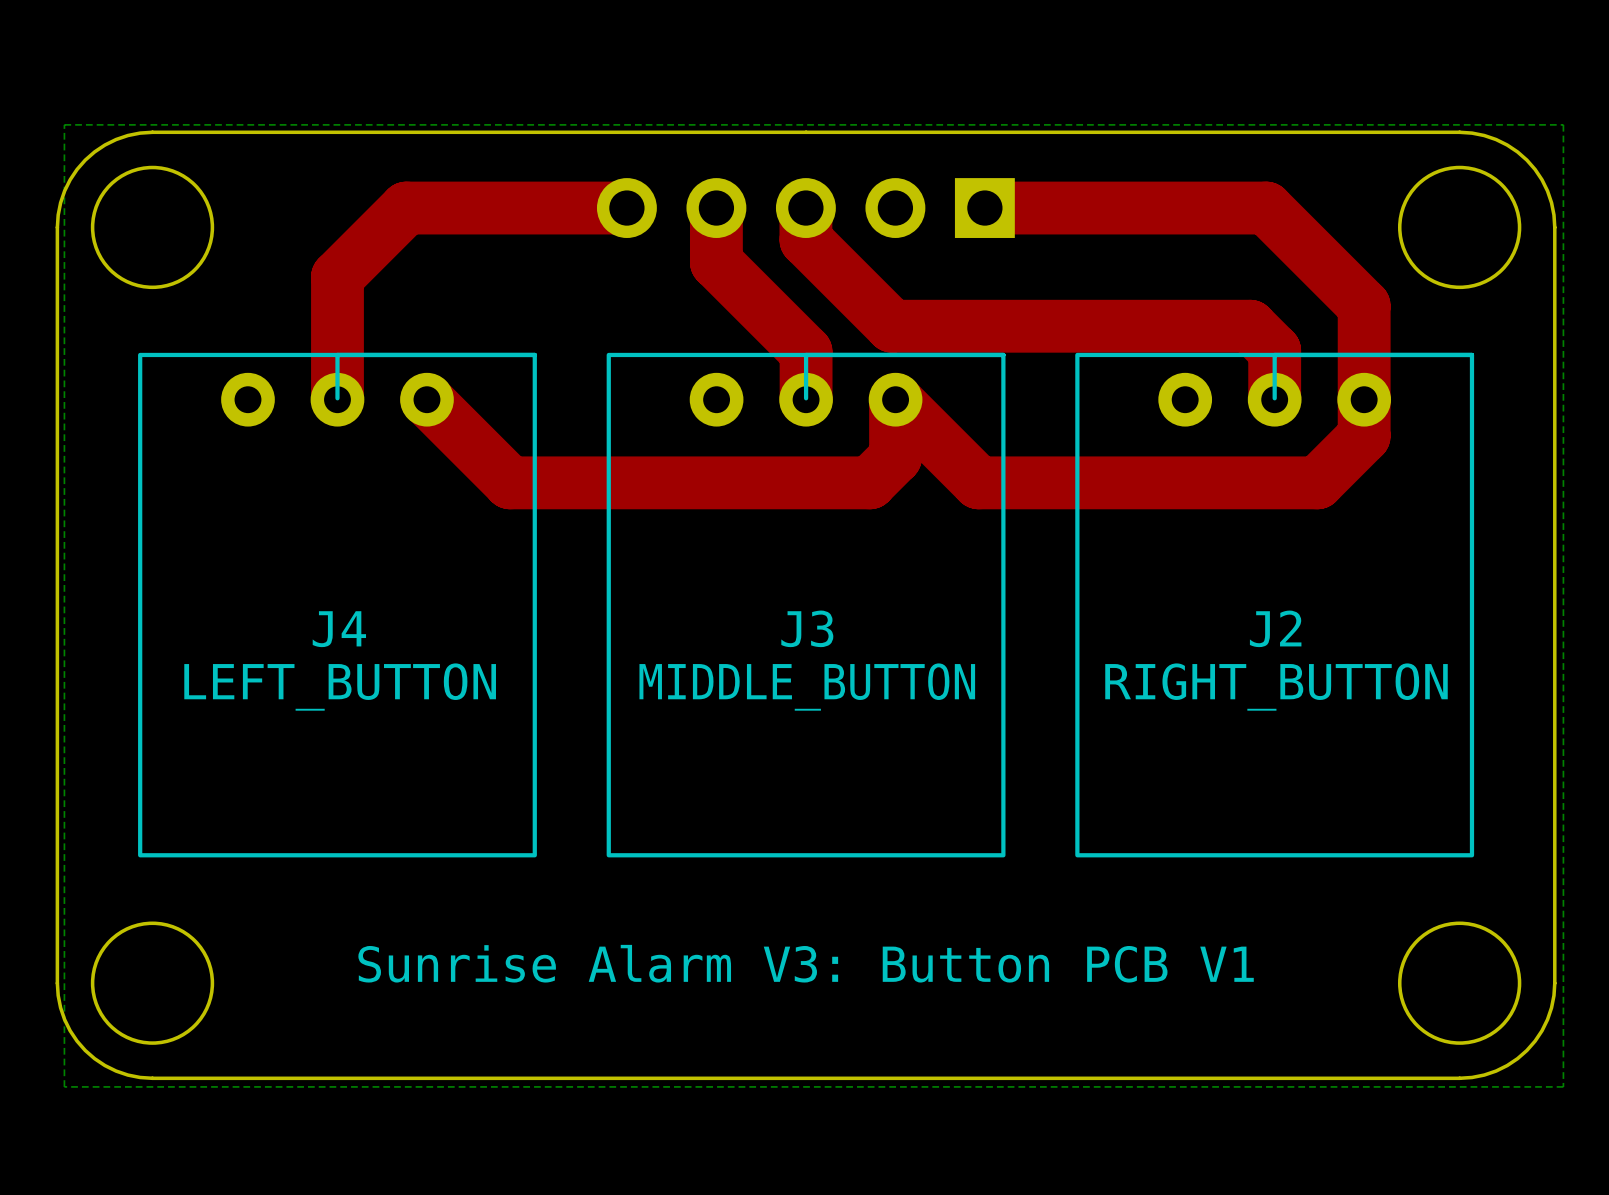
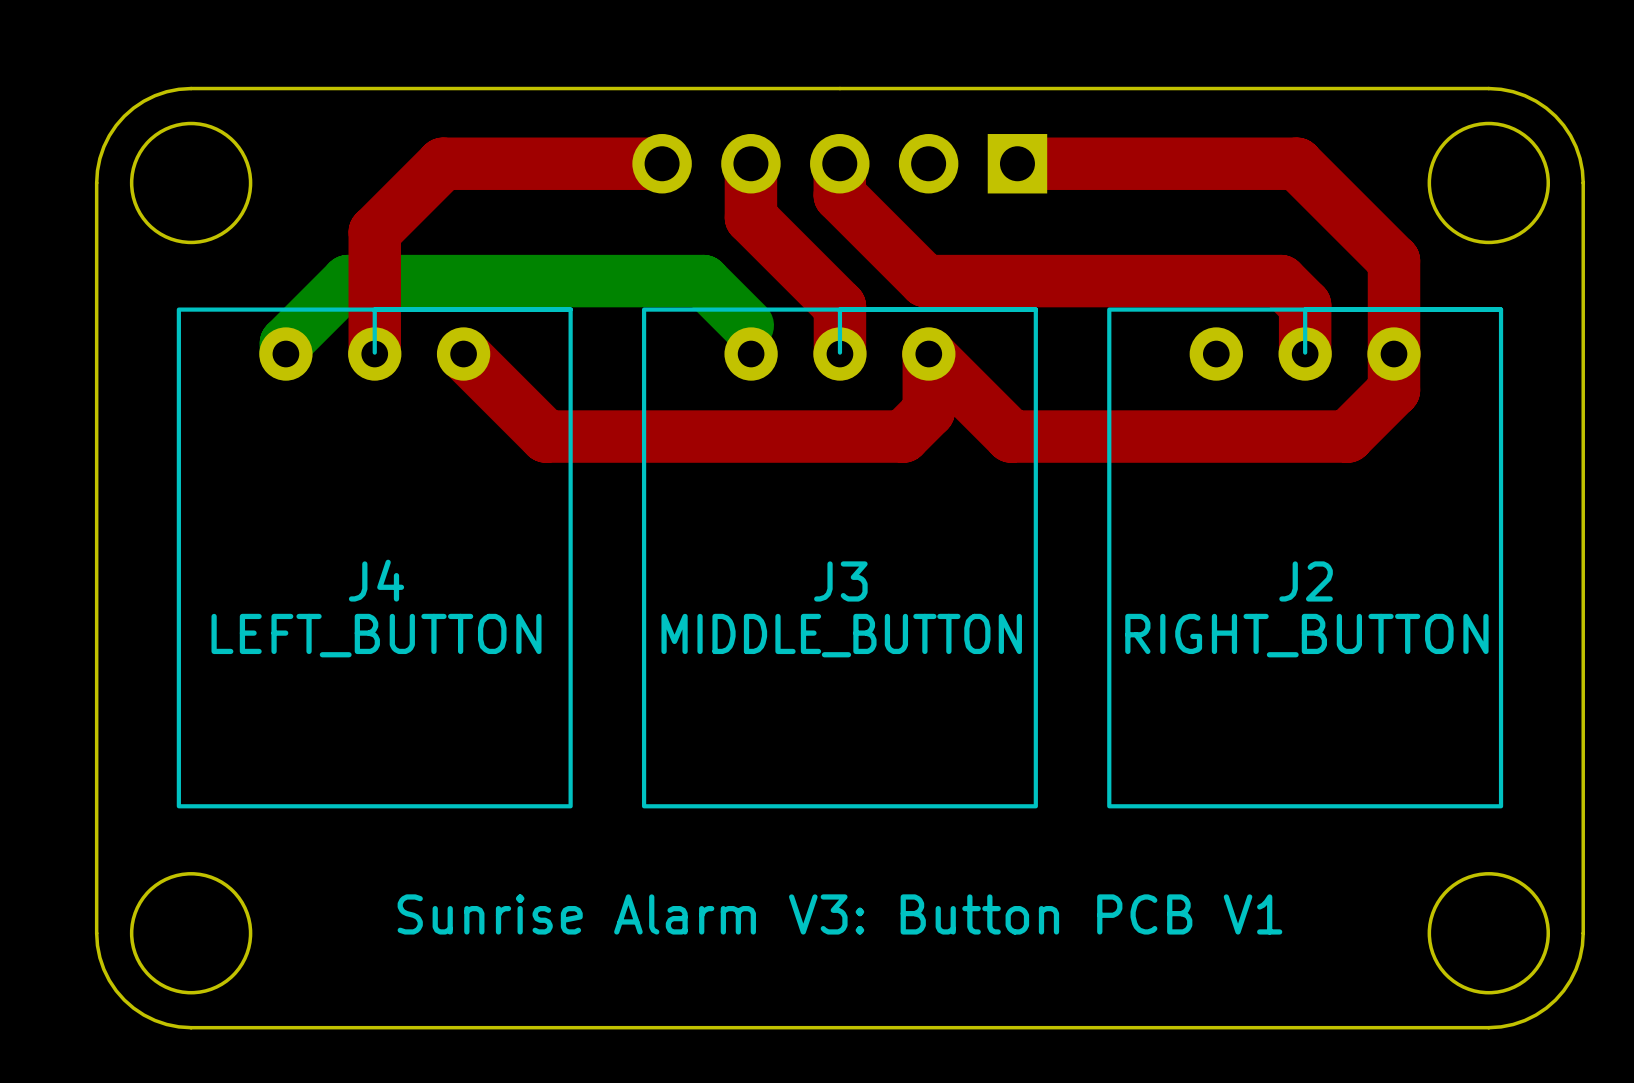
bottom zone outline: (64, 124) (1563, 124) (1563, 1086) (64, 1086) (64, 124) -> none
bottom track: none -> (747, 325) (703, 281) (347, 281) (285, 343) (285, 354)

